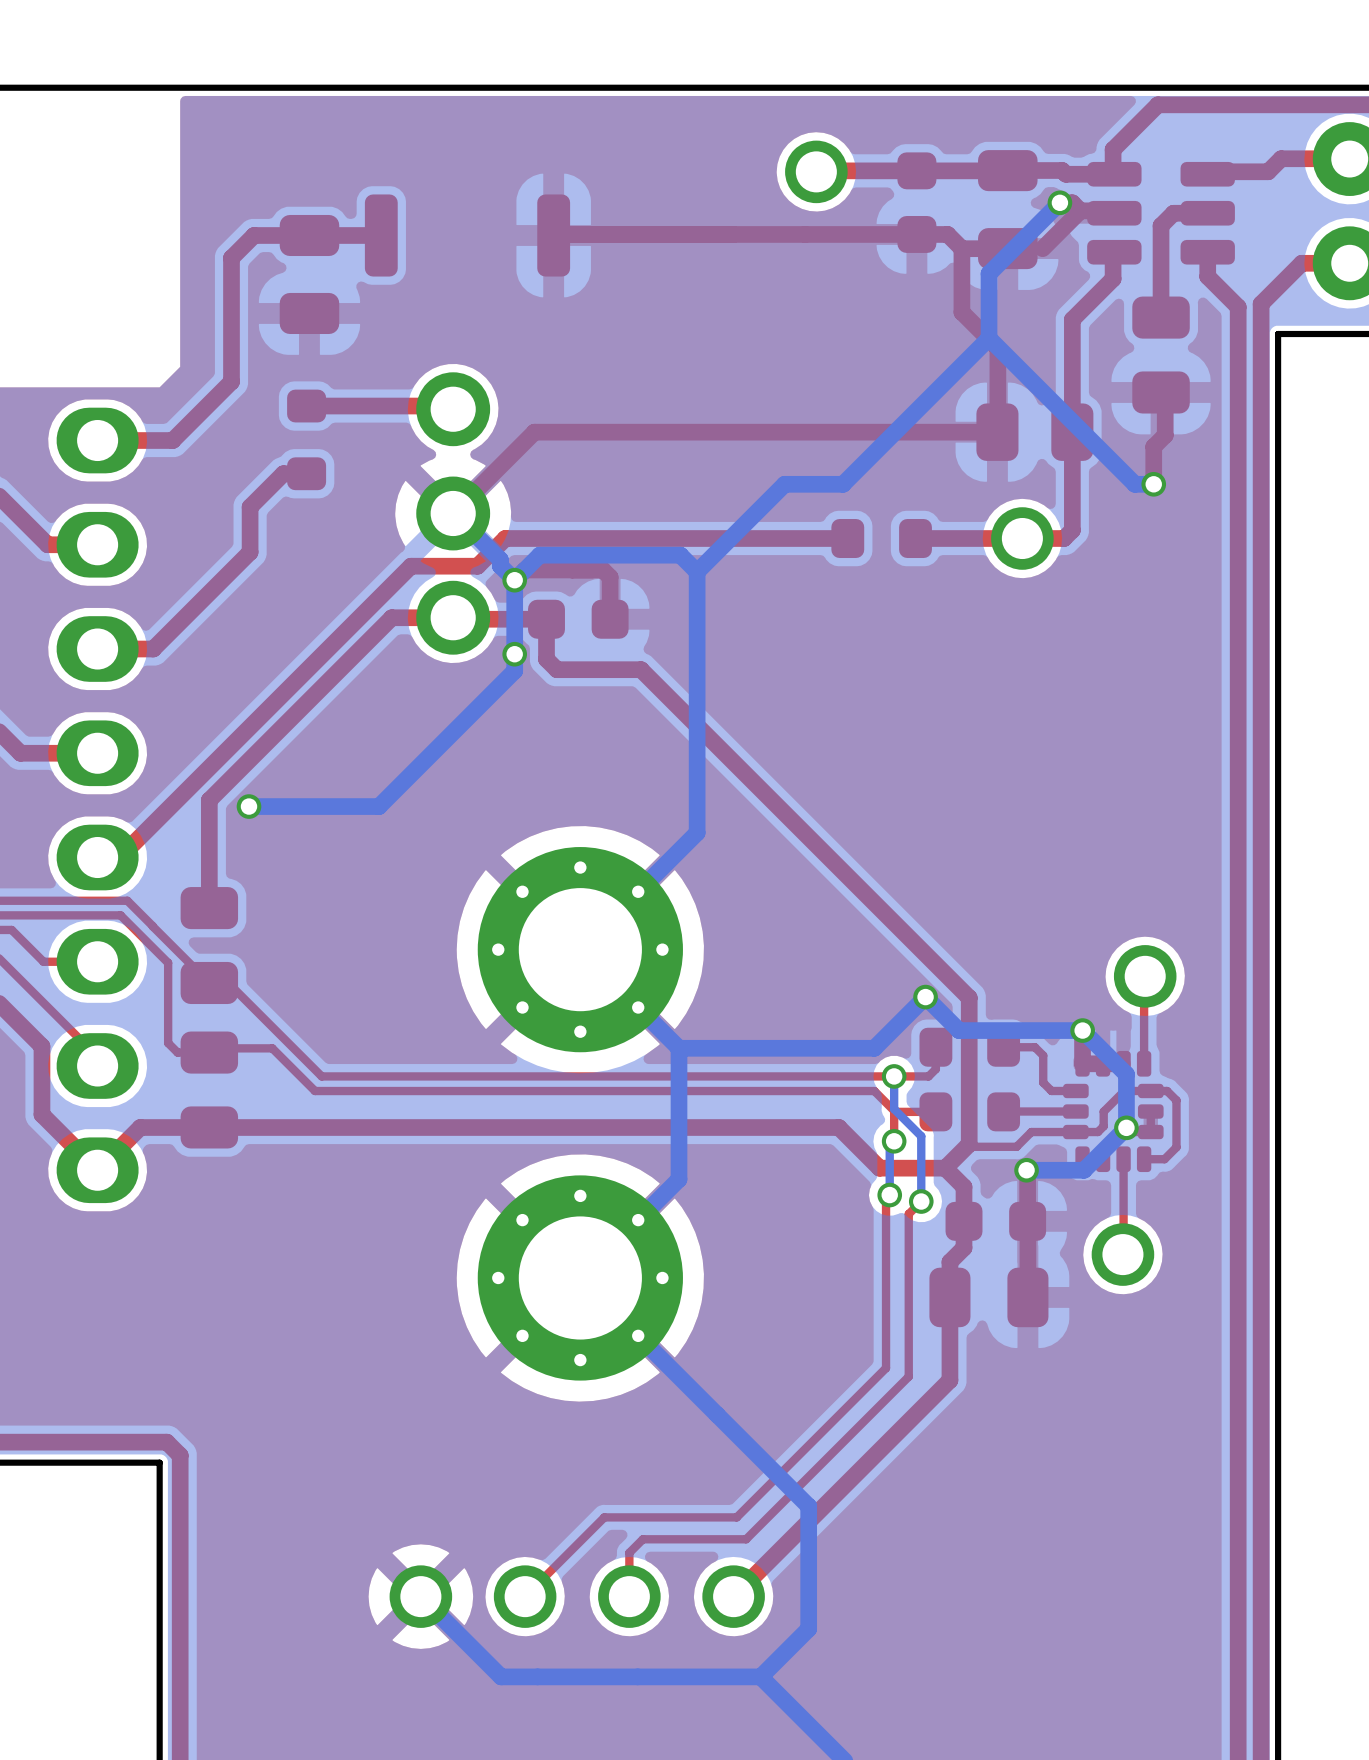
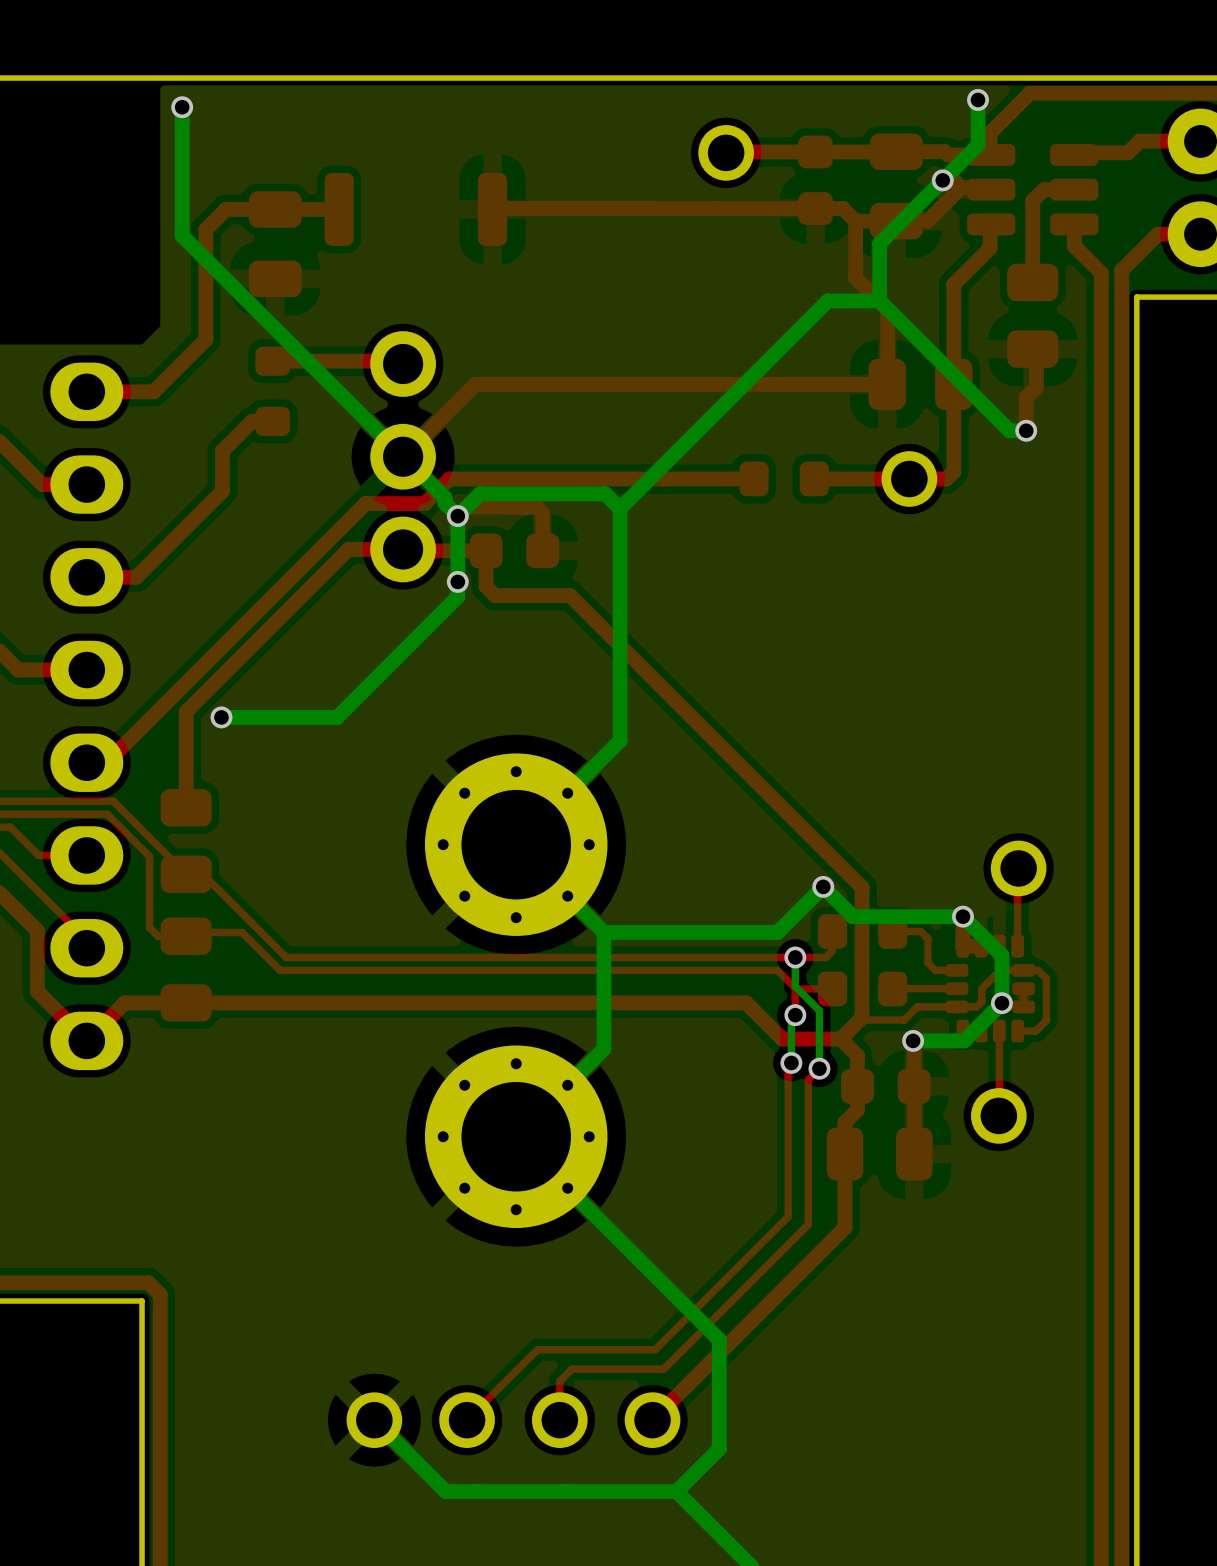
bottom track: none -> (978, 99) (978, 145) (942, 180)
via: none -> (978, 99)
bottom track: none -> (182, 107) (182, 235) (403, 456)
via: none -> (182, 107)
bottom track: (989, 338) (843, 484) (784, 484) -> (879, 300) (827, 300) (697, 430)

